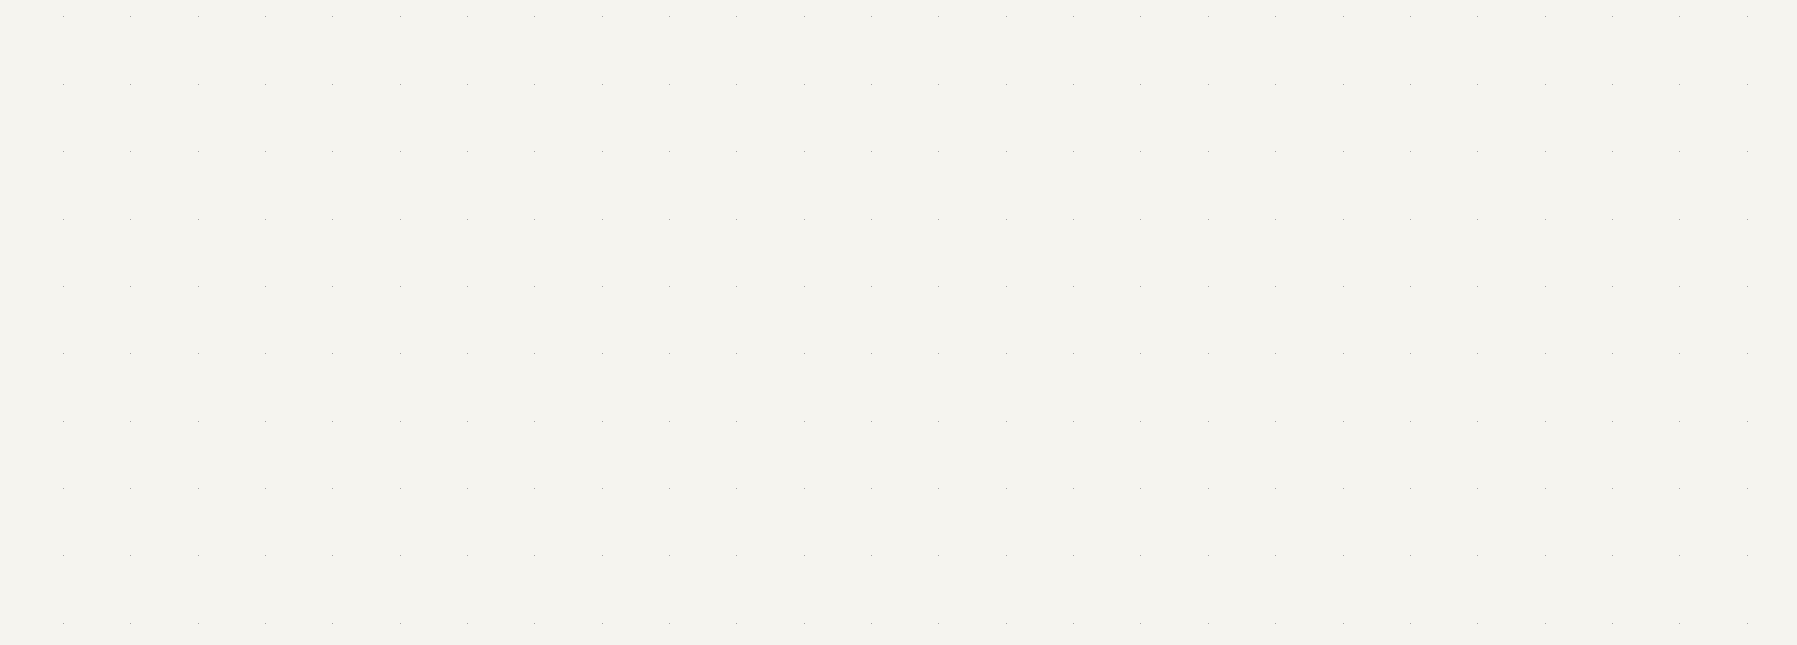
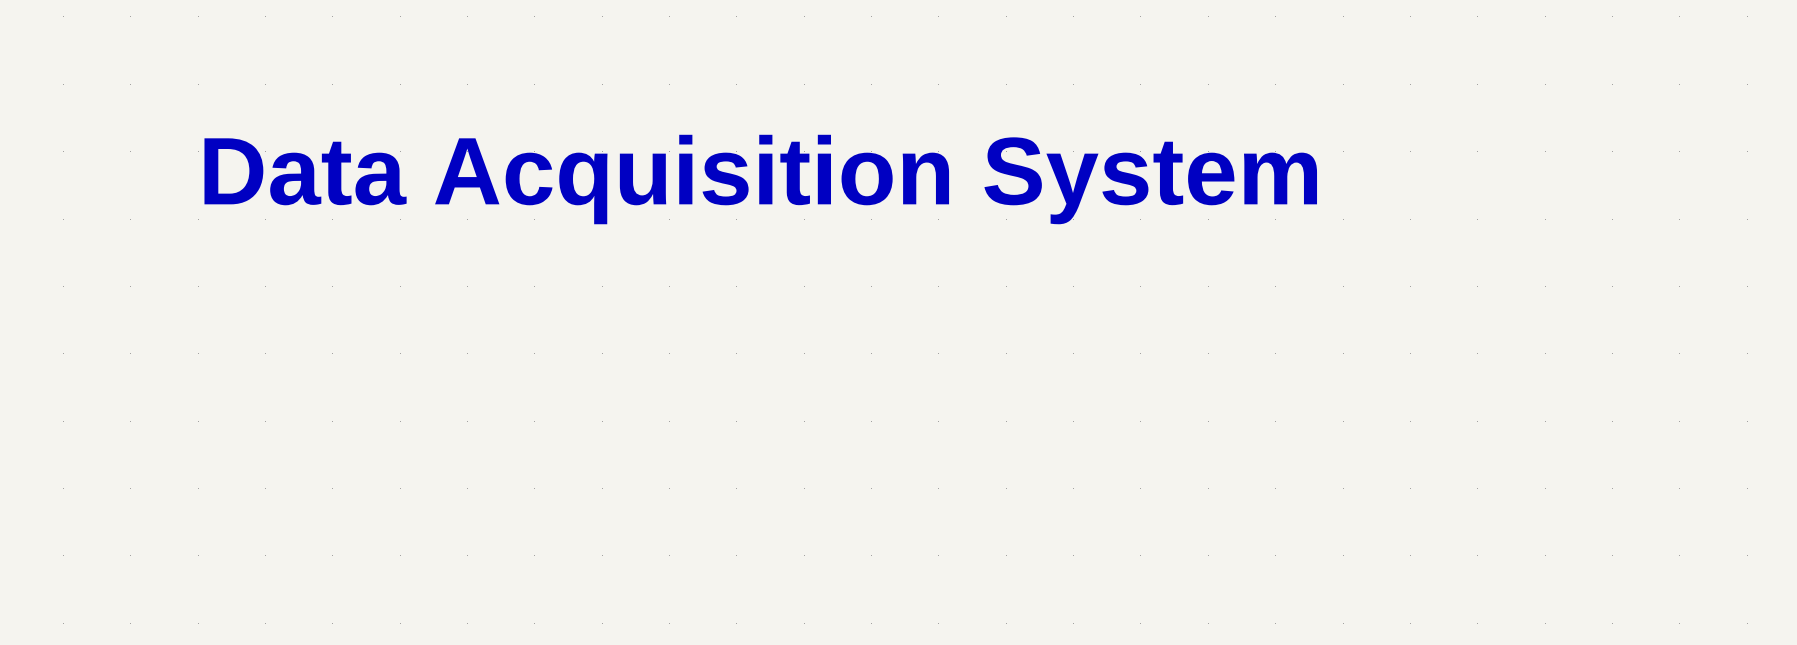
text: none -> Data Acquisition System (760, 179)

